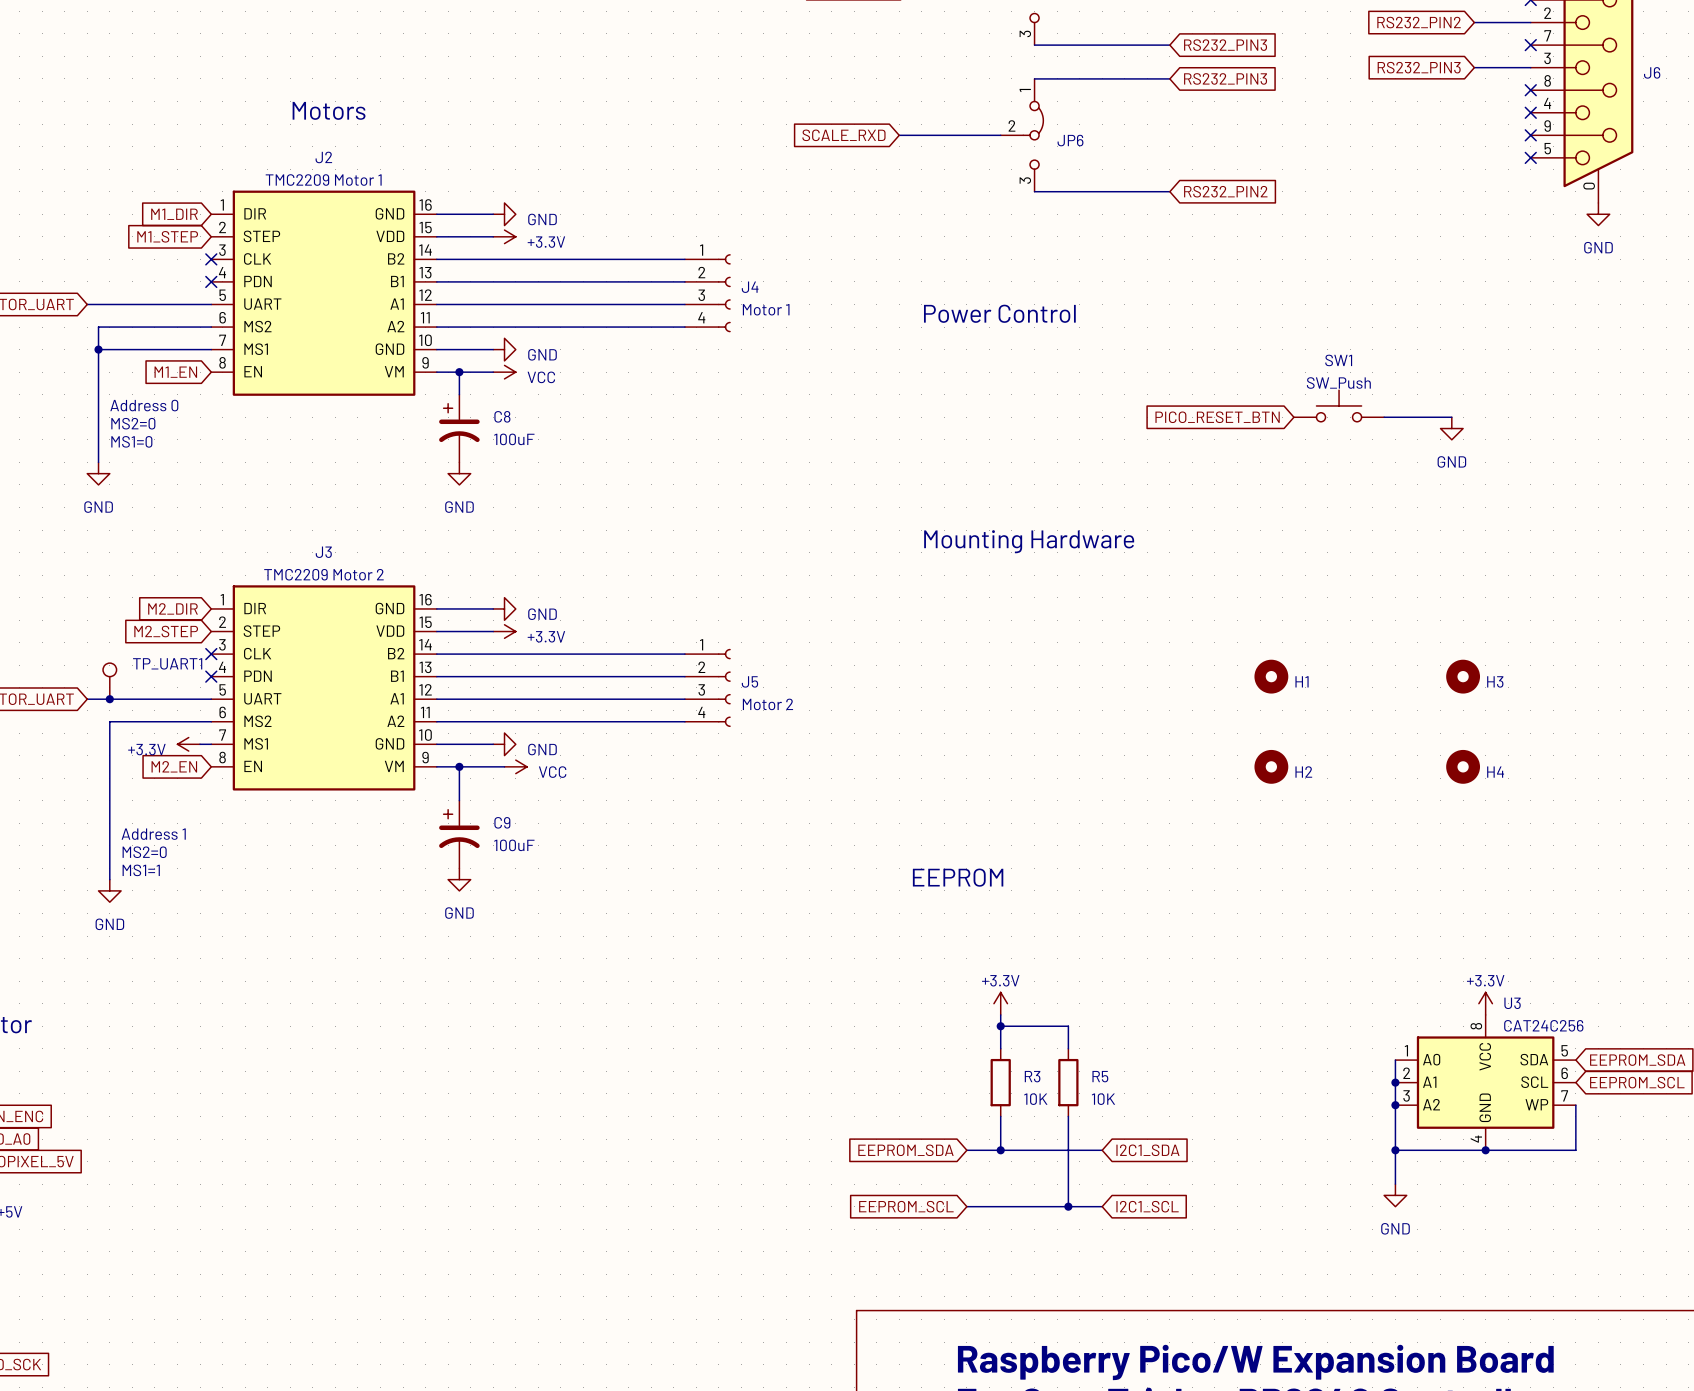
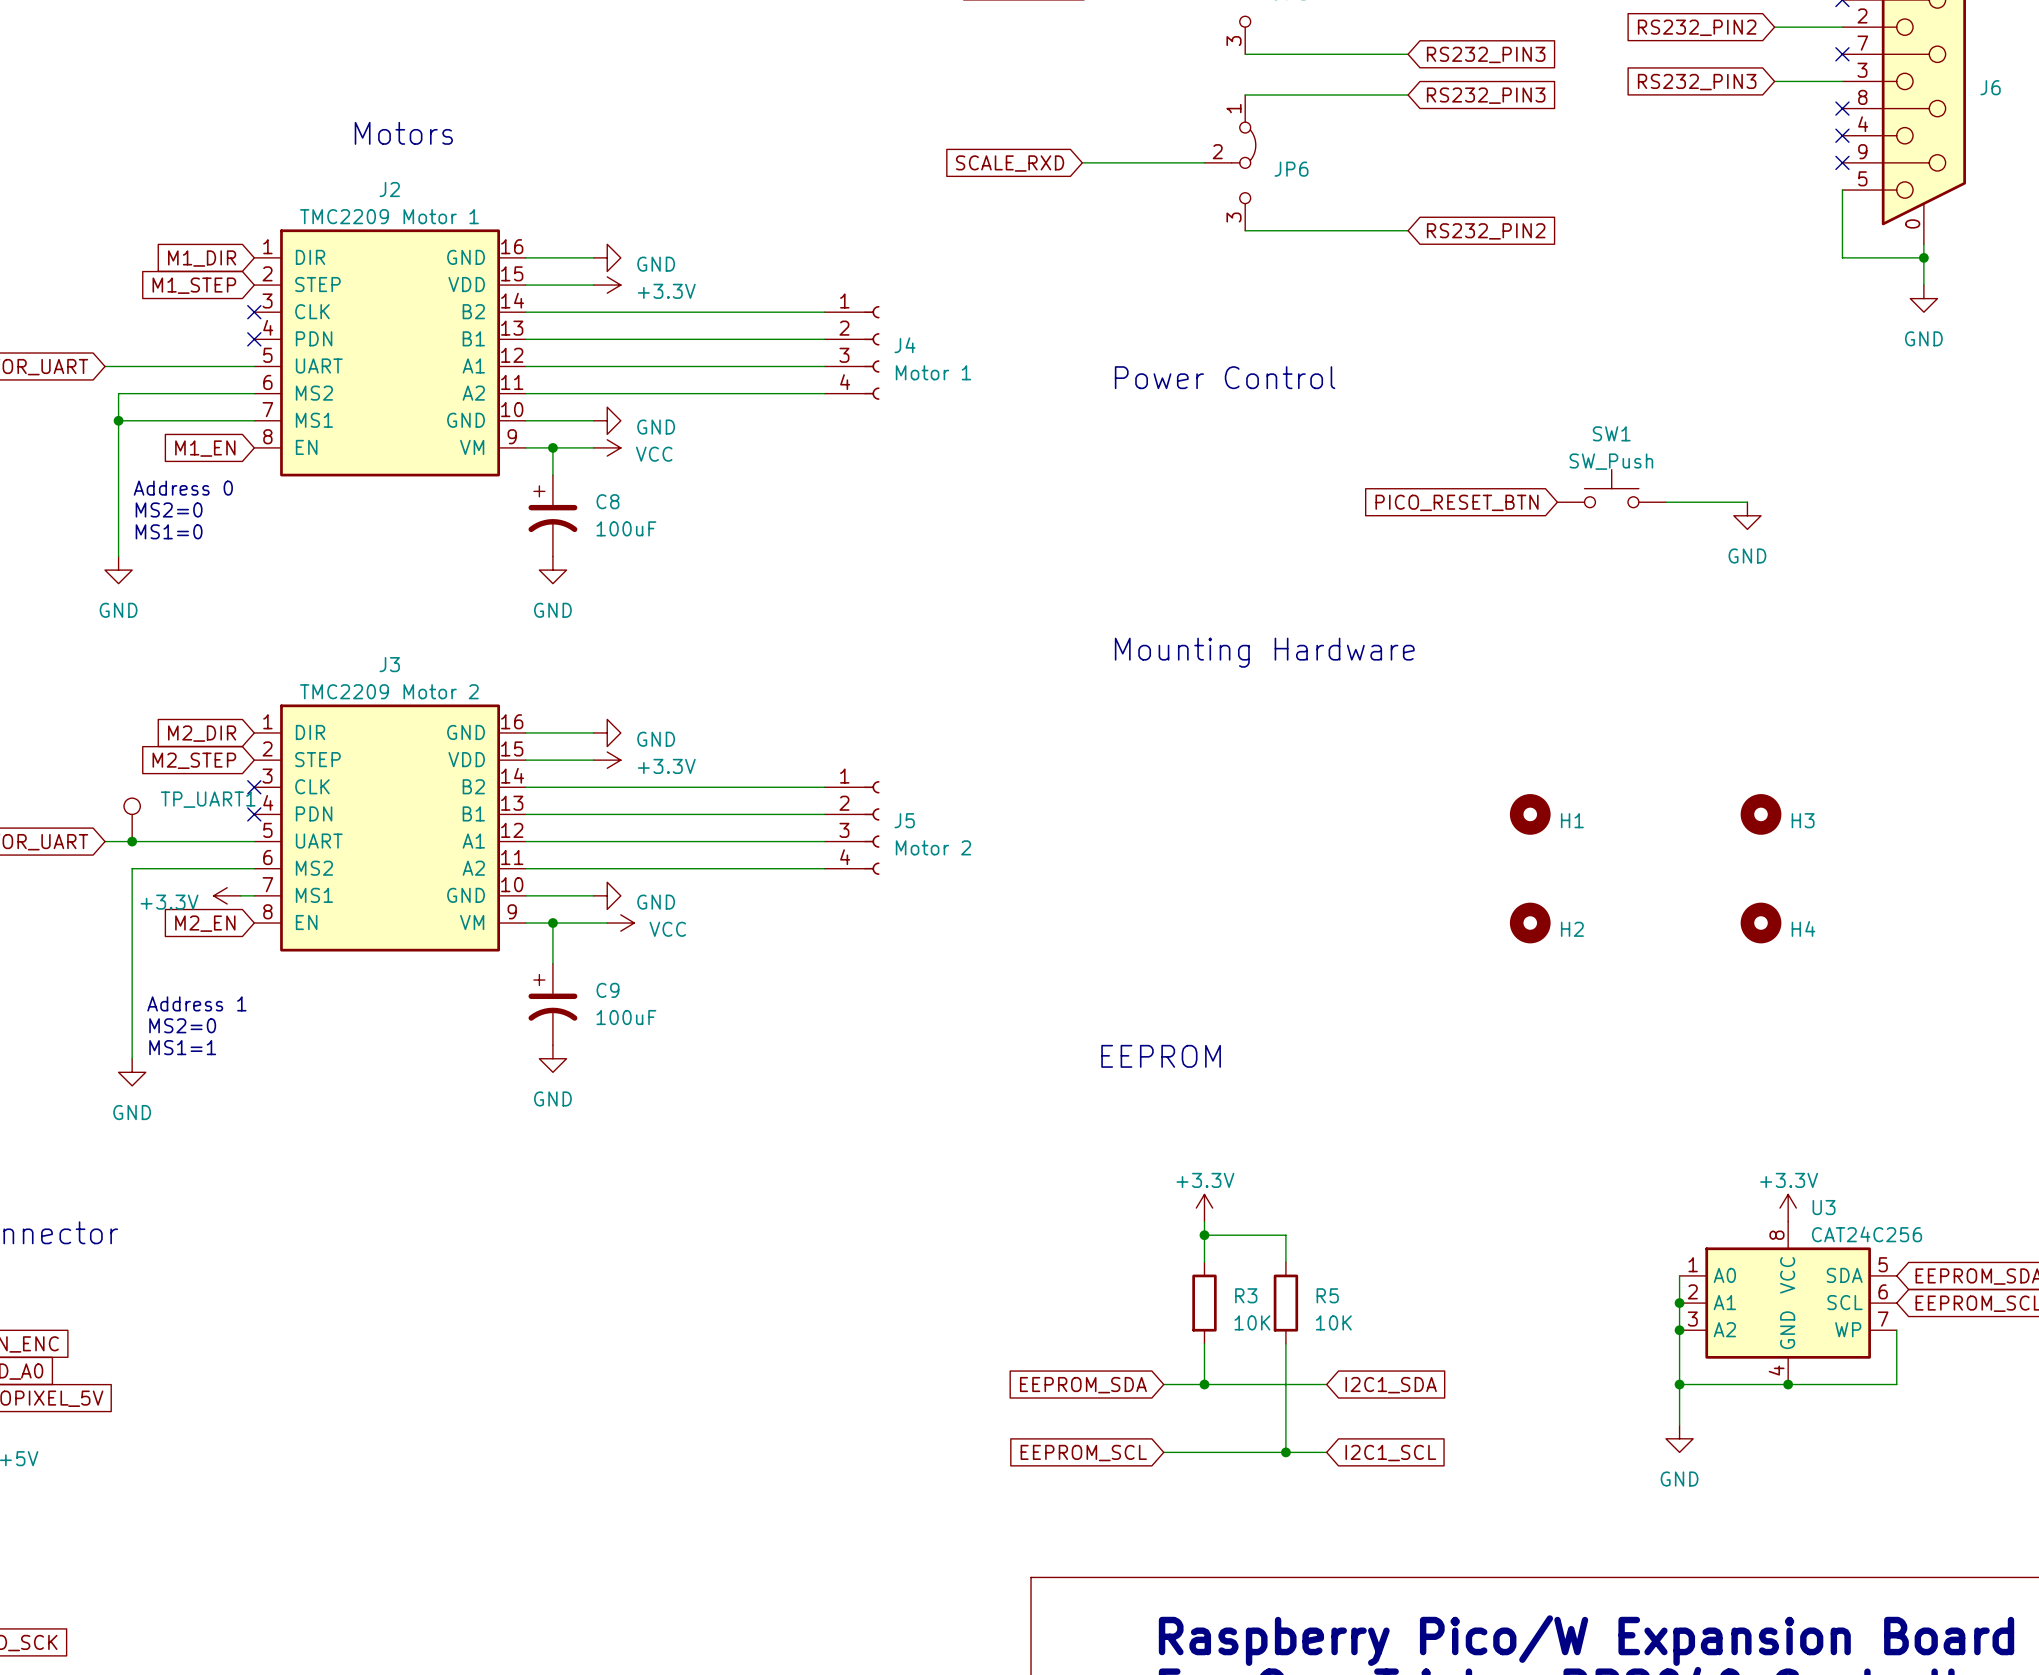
wire: none -> (1842, 190) (1842, 257) (1923, 257)
no-connect mark: (1530, 157) -> none
wire: none -> (1923, 244) (1923, 285)
power symbol position: GND (1598, 214) -> GND (1923, 298)
junction: none -> (1923, 257)

